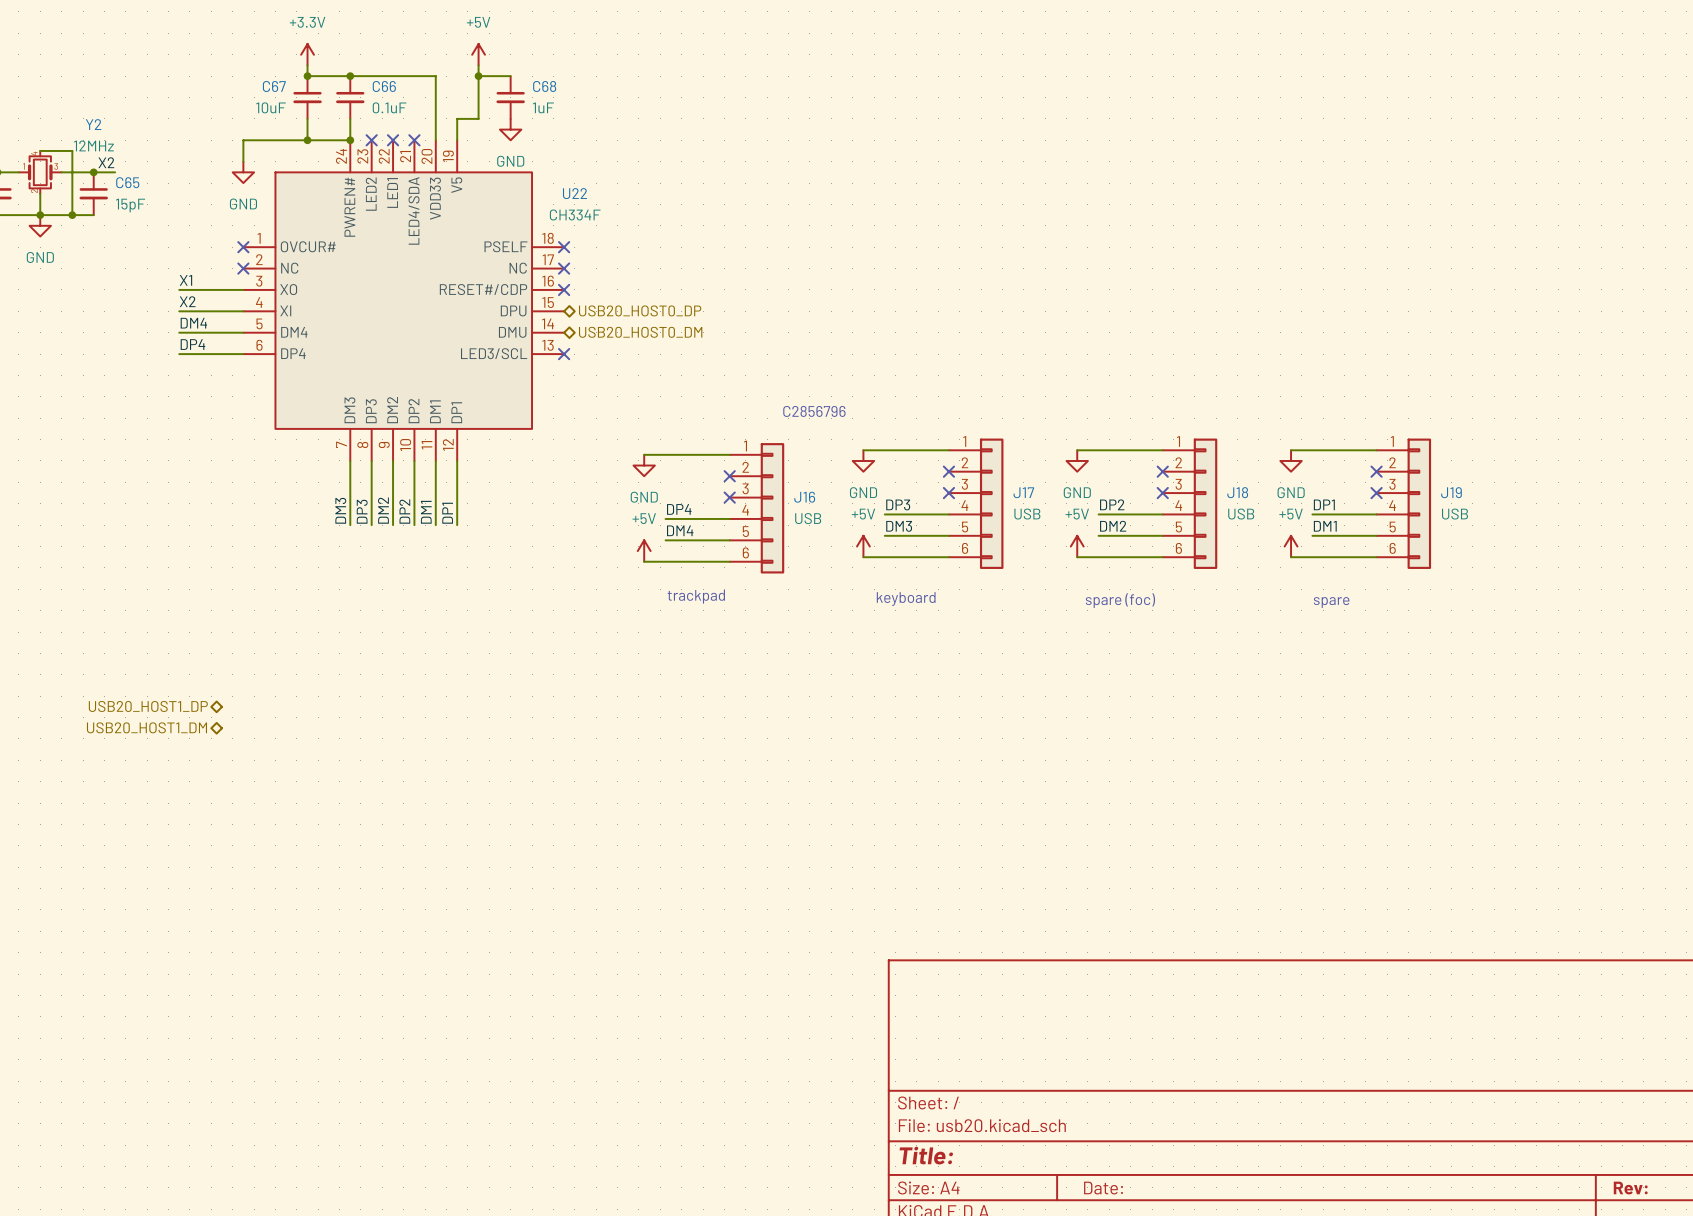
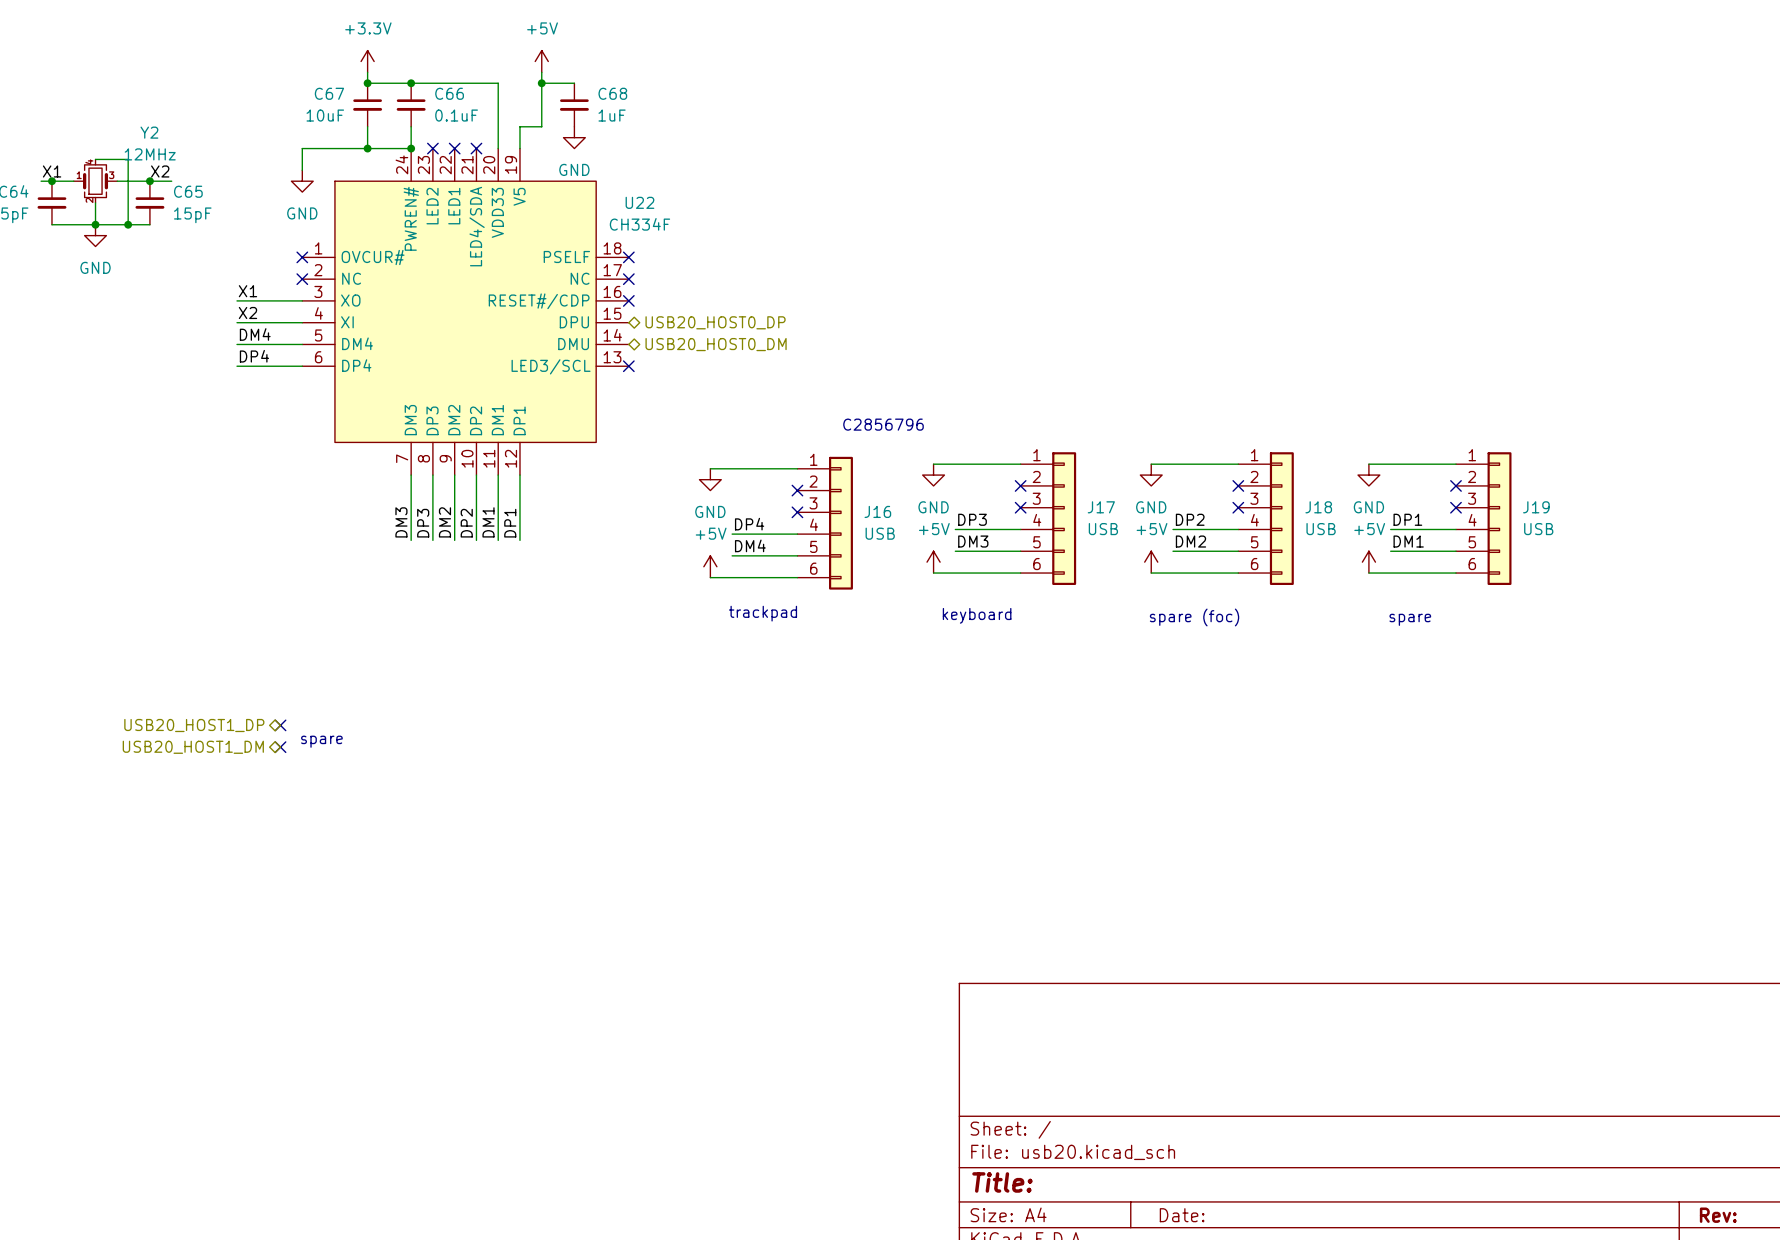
no-connect mark: none -> (280, 725)
text: none -> spare (321, 741)
no-connect mark: none -> (280, 747)

